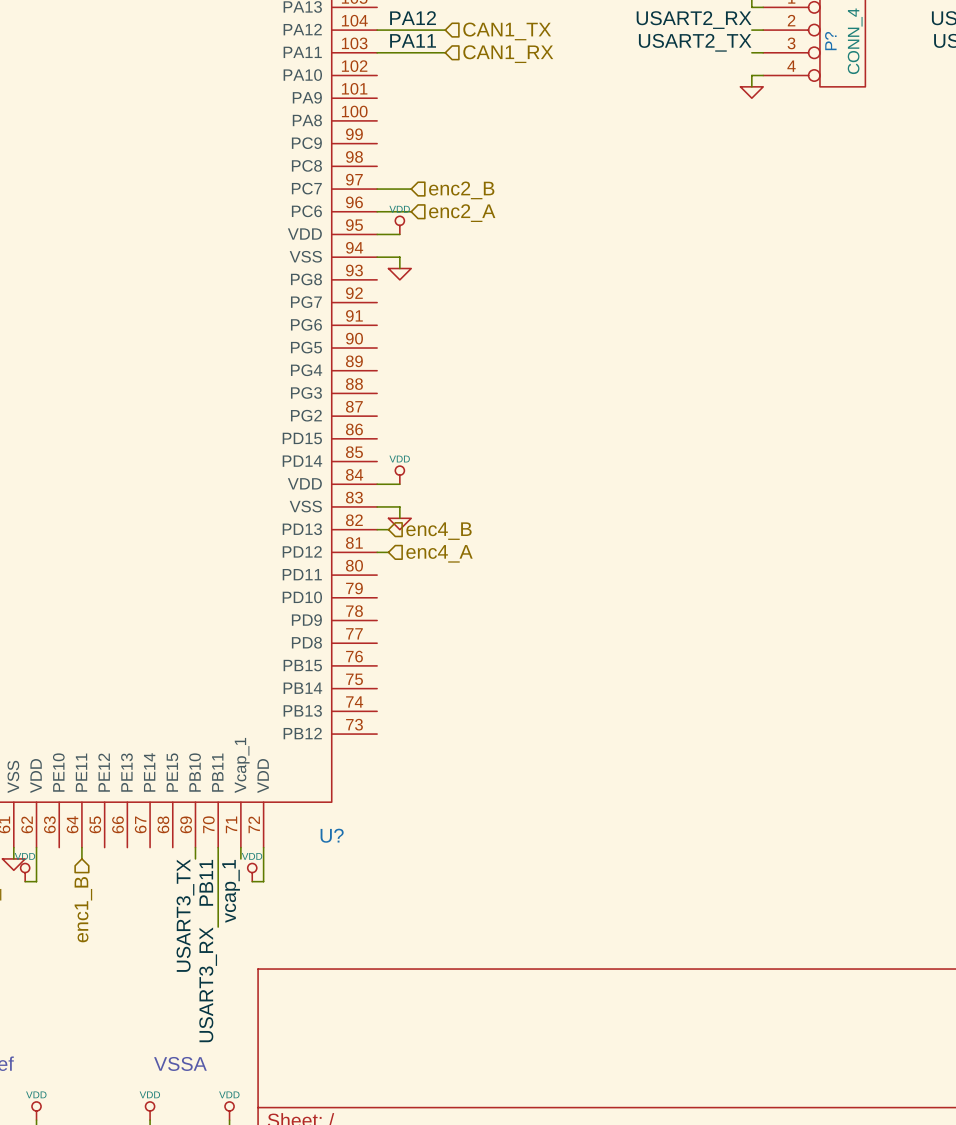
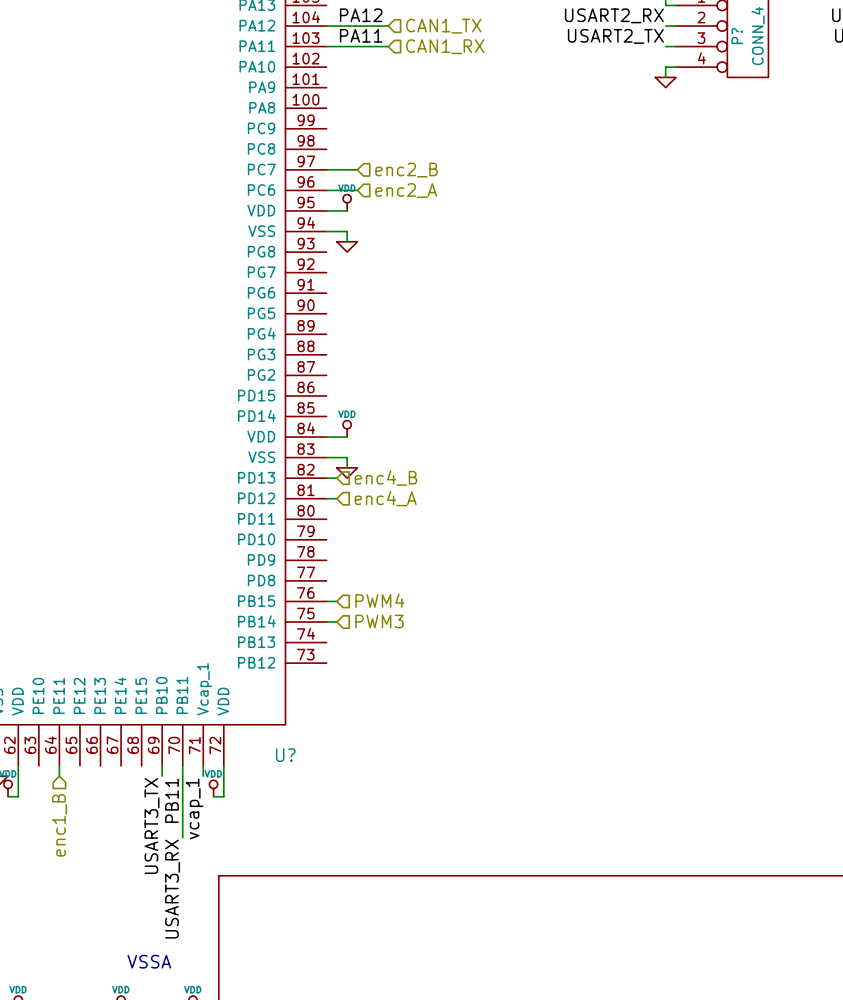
wire: none -> (326, 601) (336, 601)
hierarchical label: none -> PWM4 (379, 600)
wire: none -> (326, 622) (336, 622)
hierarchical label: none -> PWM3 (379, 621)

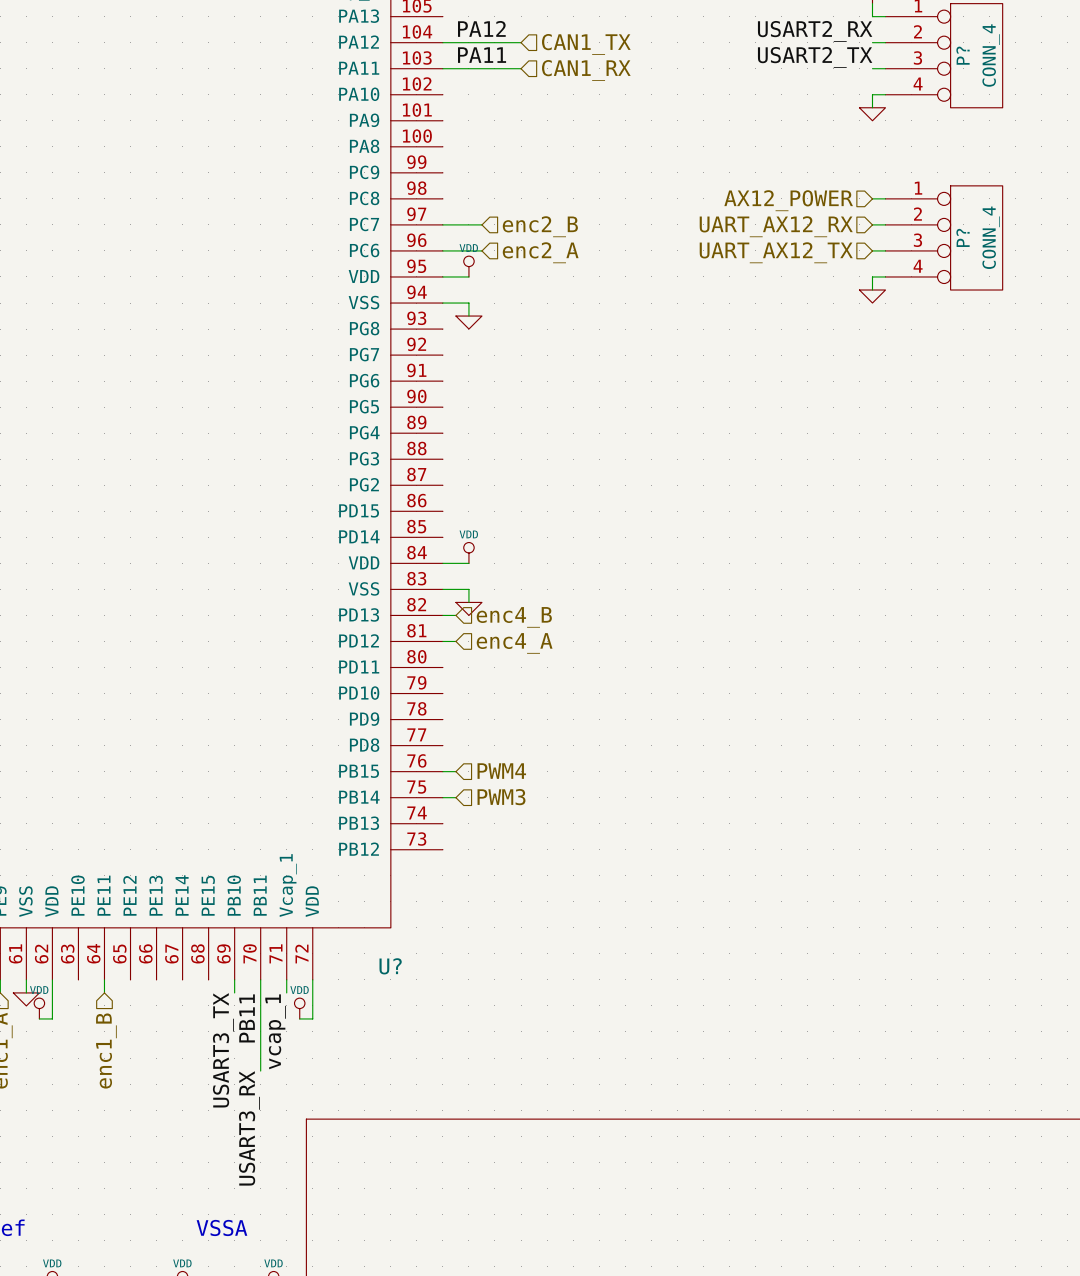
hierarchical label: none -> AX12_POWER (788, 200)
wire: none -> (872, 198) (885, 198)
wire: none -> (872, 224) (885, 224)
hierarchical label: none -> UART_AX12_RX (776, 226)
P?: none -> CONN_4 (944, 237)
hierarchical label: none -> UART_AX12_TX (776, 252)
wire: none -> (872, 250) (885, 250)
wire: none -> (885, 276) (872, 276) (872, 290)
power symbol: none -> (872, 296)

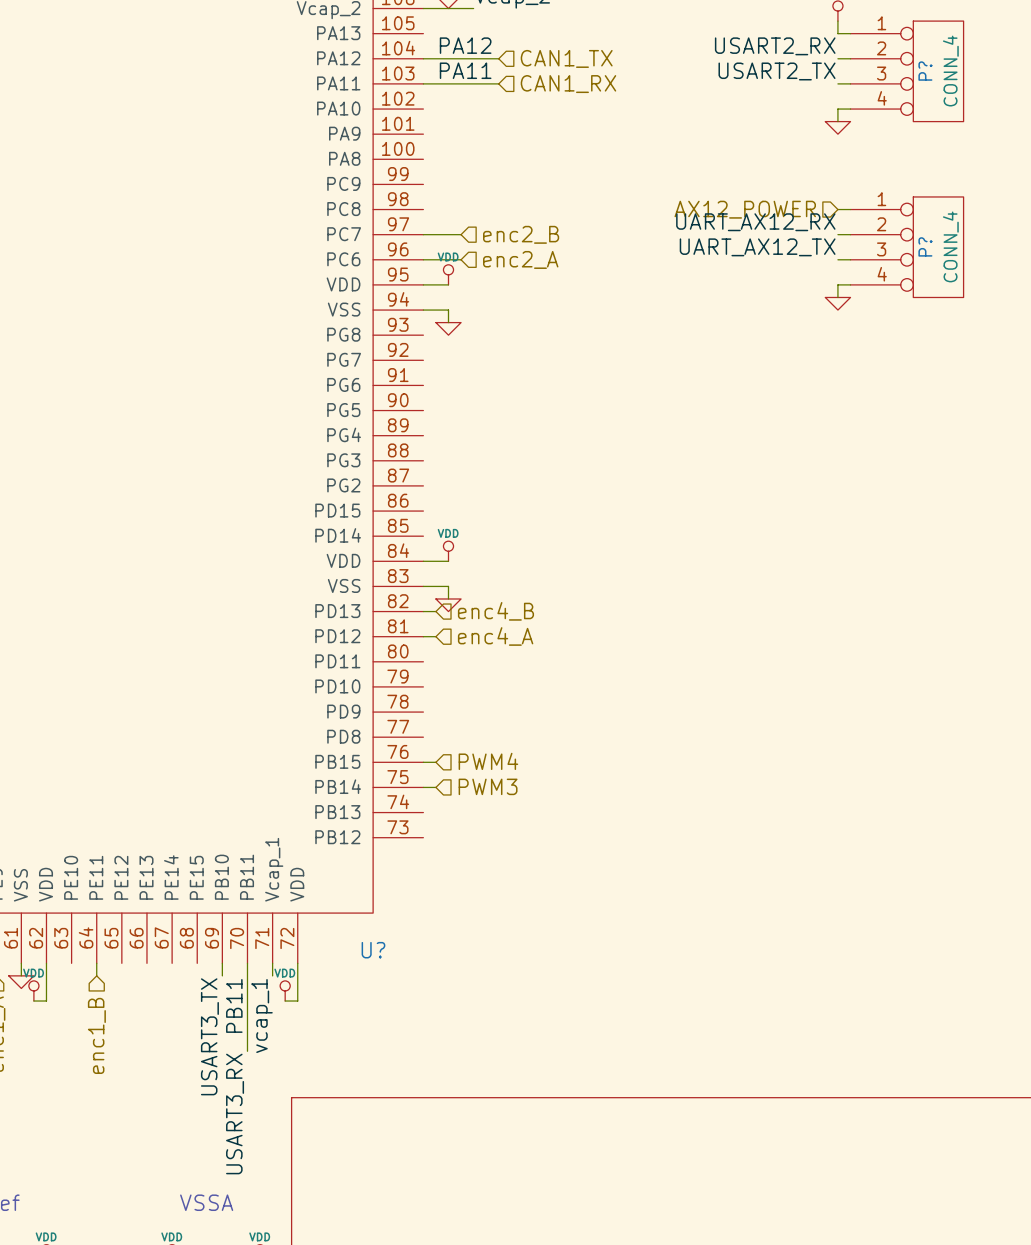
label: none -> UART_AX12_RX (755, 222)
hierarchical label: UART_AX12_RX (776, 226) -> none
label: none -> UART_AX12_TX (757, 247)
hierarchical label: UART_AX12_TX (776, 252) -> none

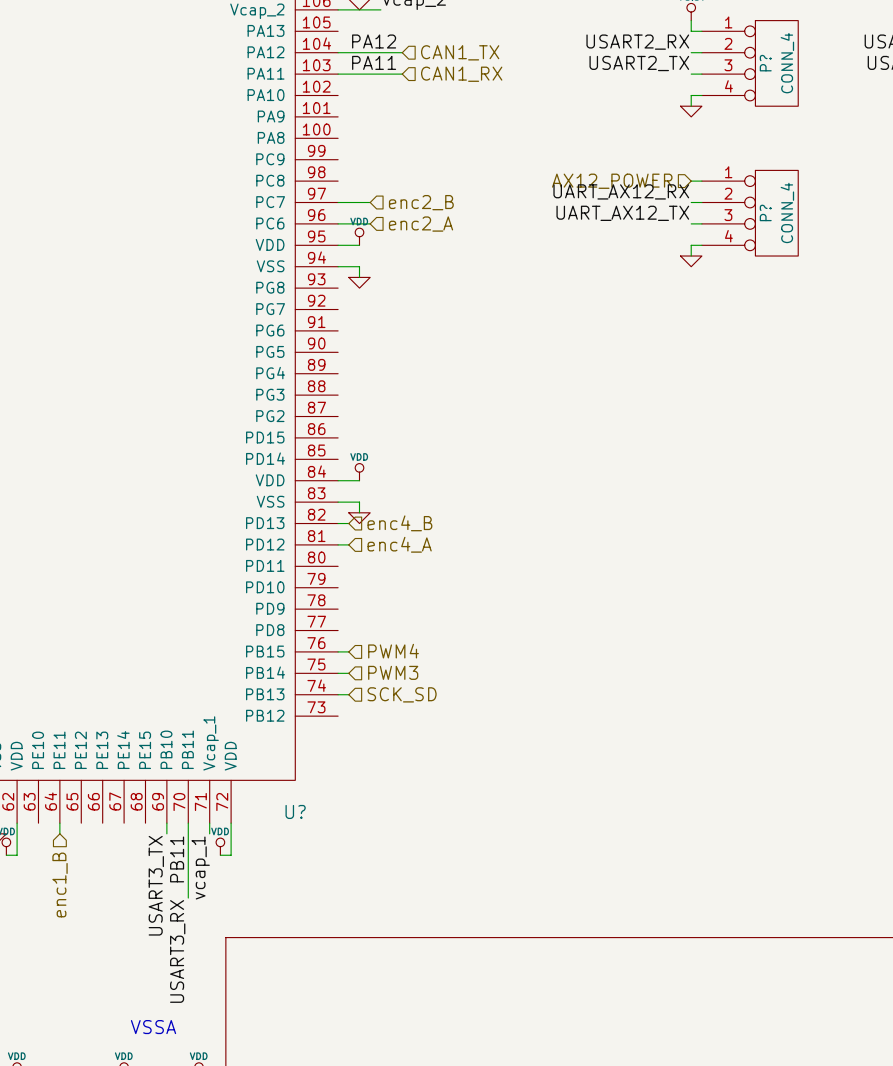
wire: none -> (338, 694) (348, 694)
hierarchical label: none -> SCK_SD (402, 694)

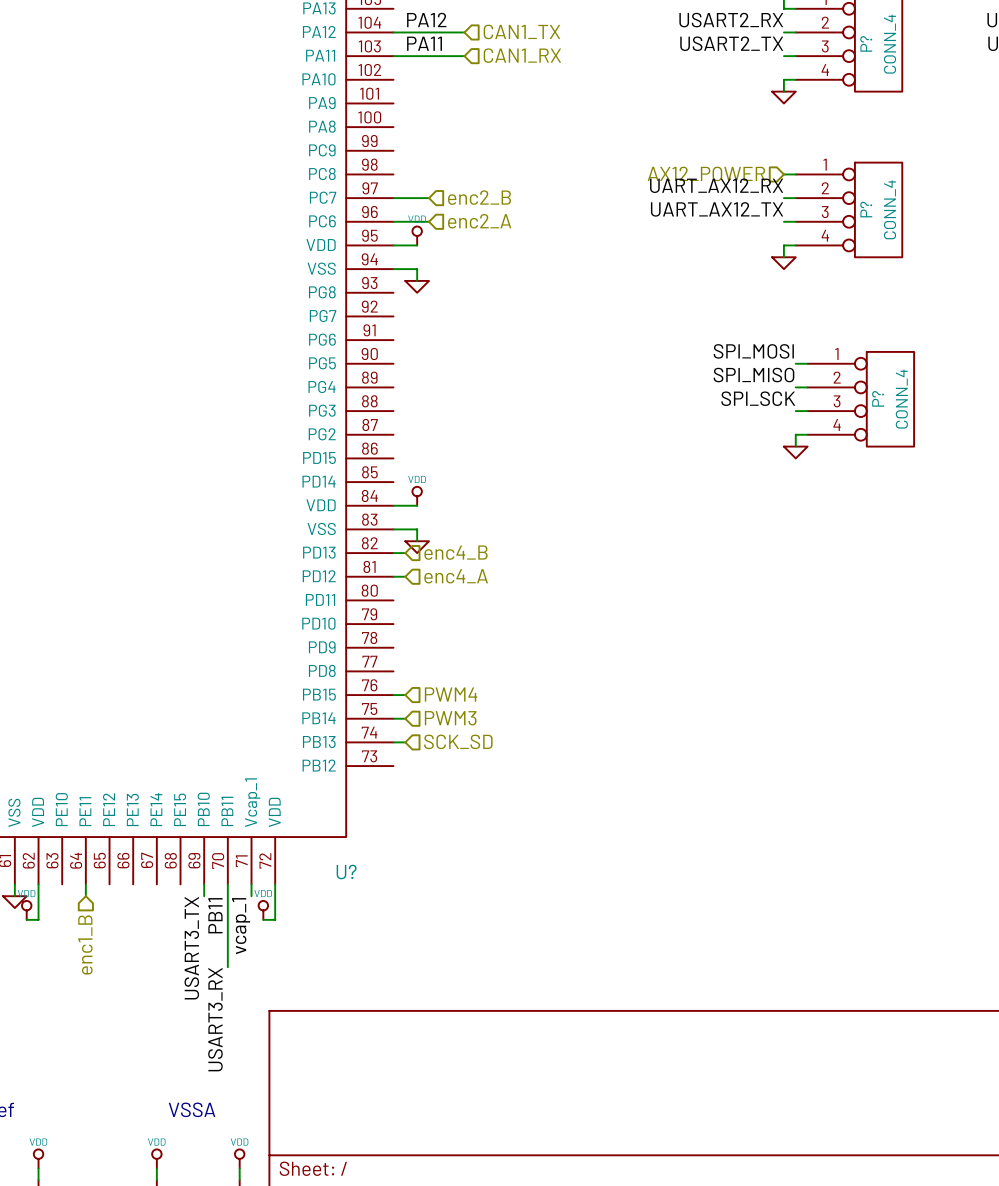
label: none -> SPI_MOSI (753, 351)
wire: none -> (795, 363) (807, 363)
label: none -> SPI_MISO (754, 375)
wire: none -> (795, 387) (807, 387)
label: none -> SPI_SCK (758, 398)
P?: none -> CONN_4 (860, 399)
wire: none -> (795, 411) (807, 411)
wire: none -> (807, 434) (795, 434) (795, 446)
power symbol: none -> (795, 452)

